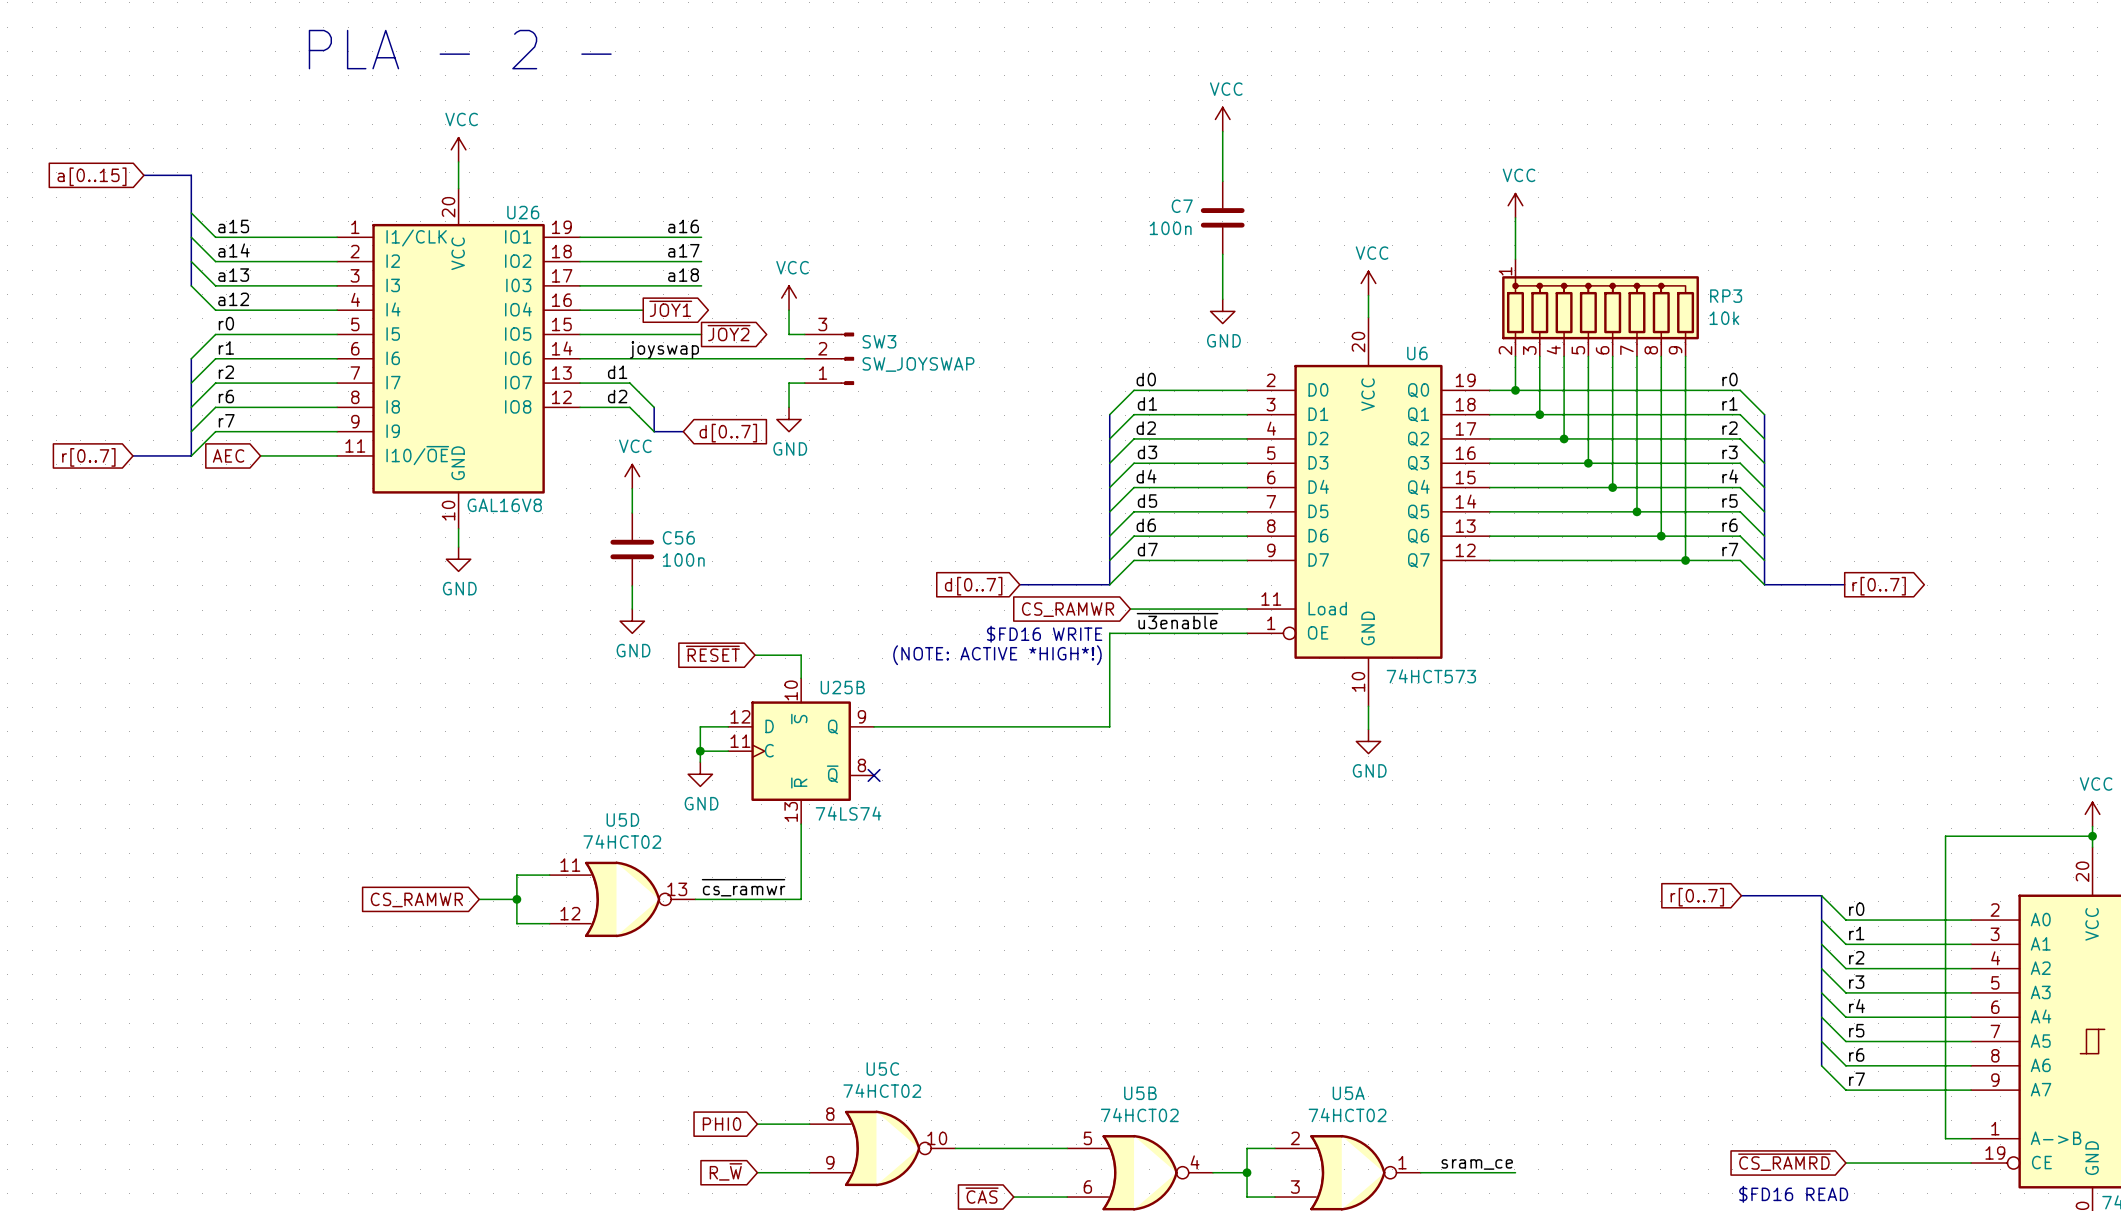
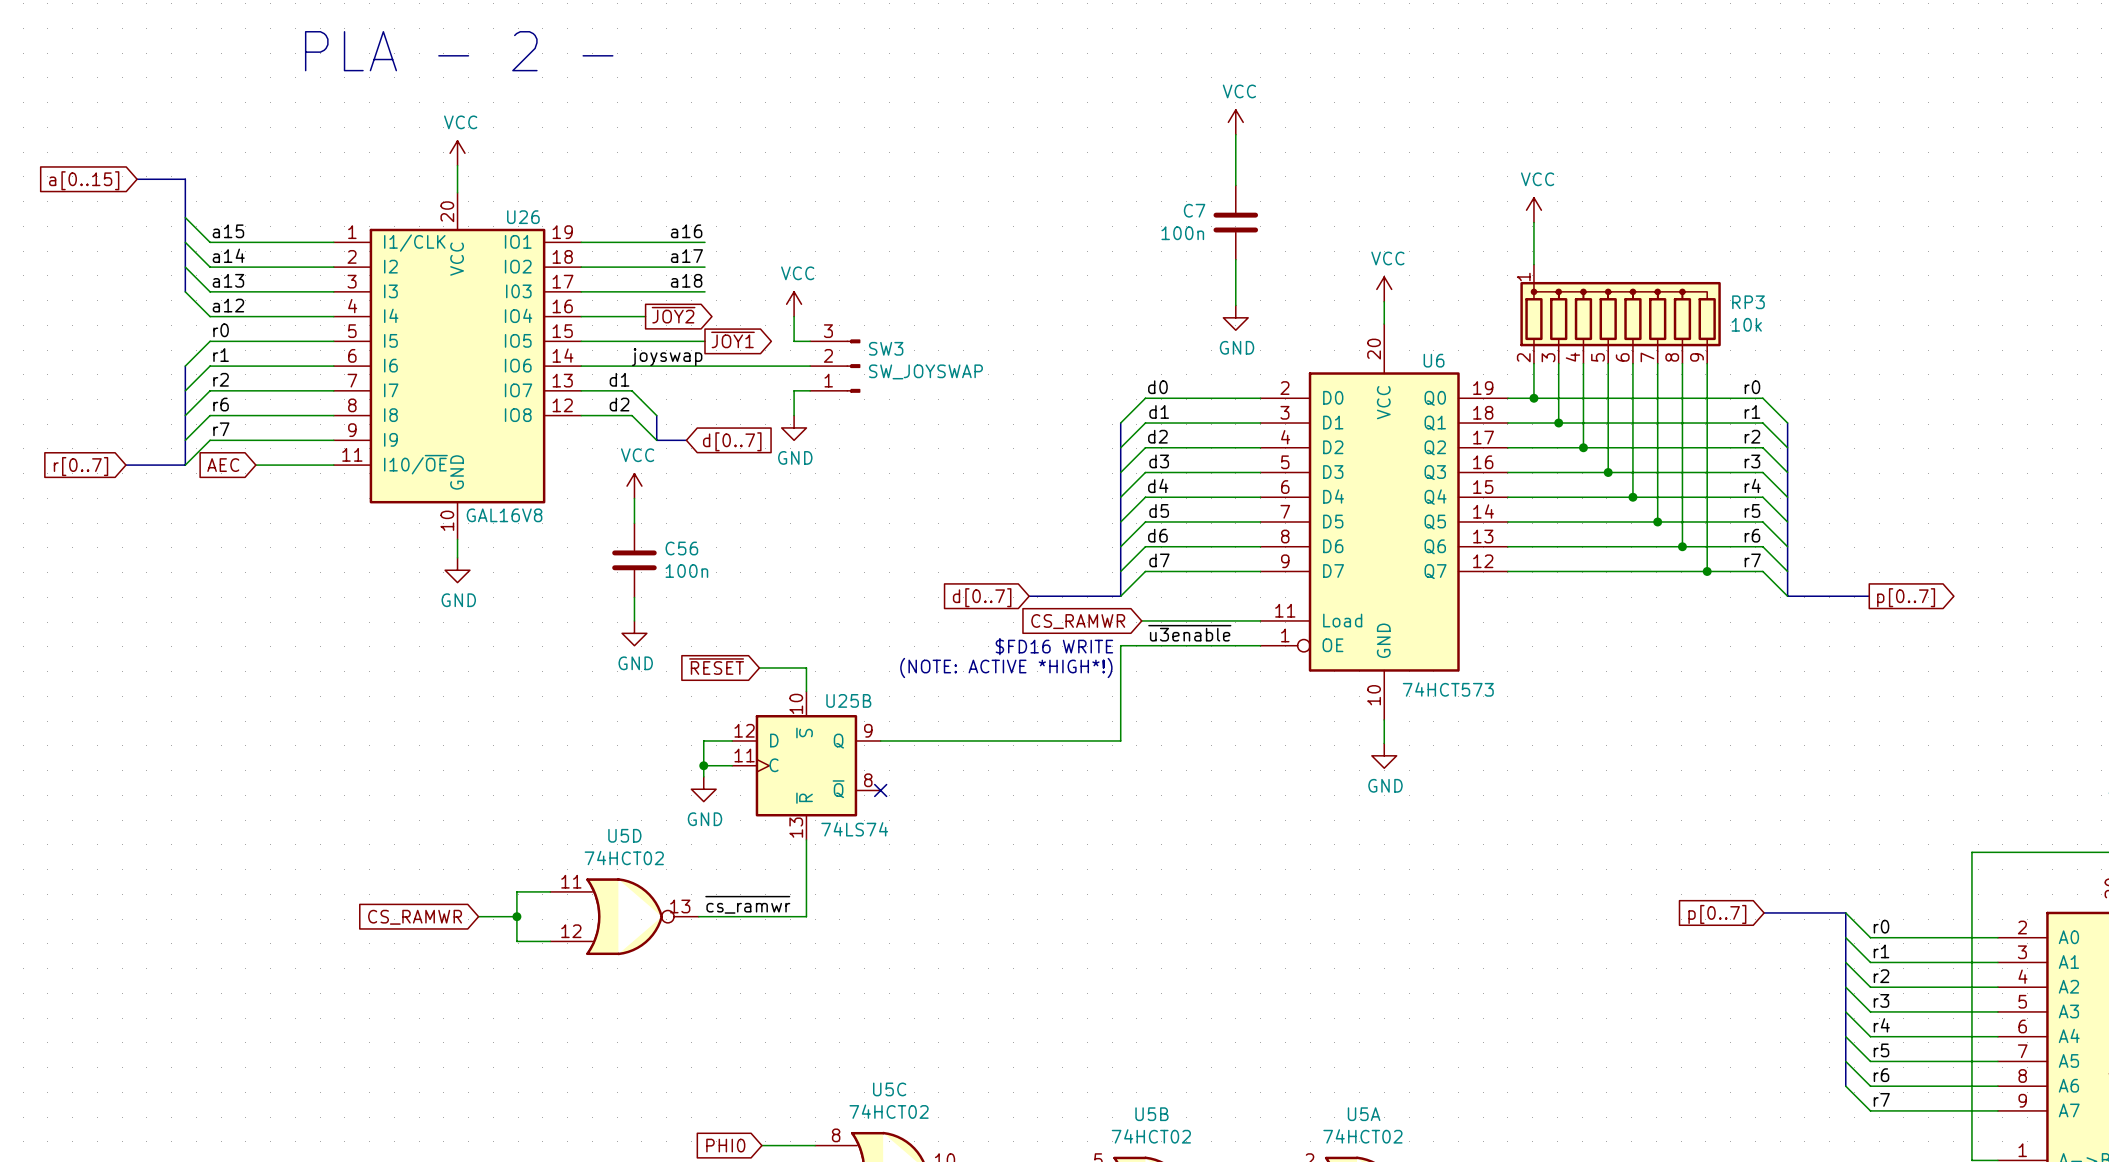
global label: ~{JOY1} (670, 308) -> ~{JOY2} (673, 315)
global label: ~{JOY2} (729, 333) -> ~{JOY1} (732, 339)
global label: r[0..7] (1879, 586) -> p[0..7] (1906, 597)
global label: r[0..7] (1697, 897) -> p[0..7] (1717, 914)

